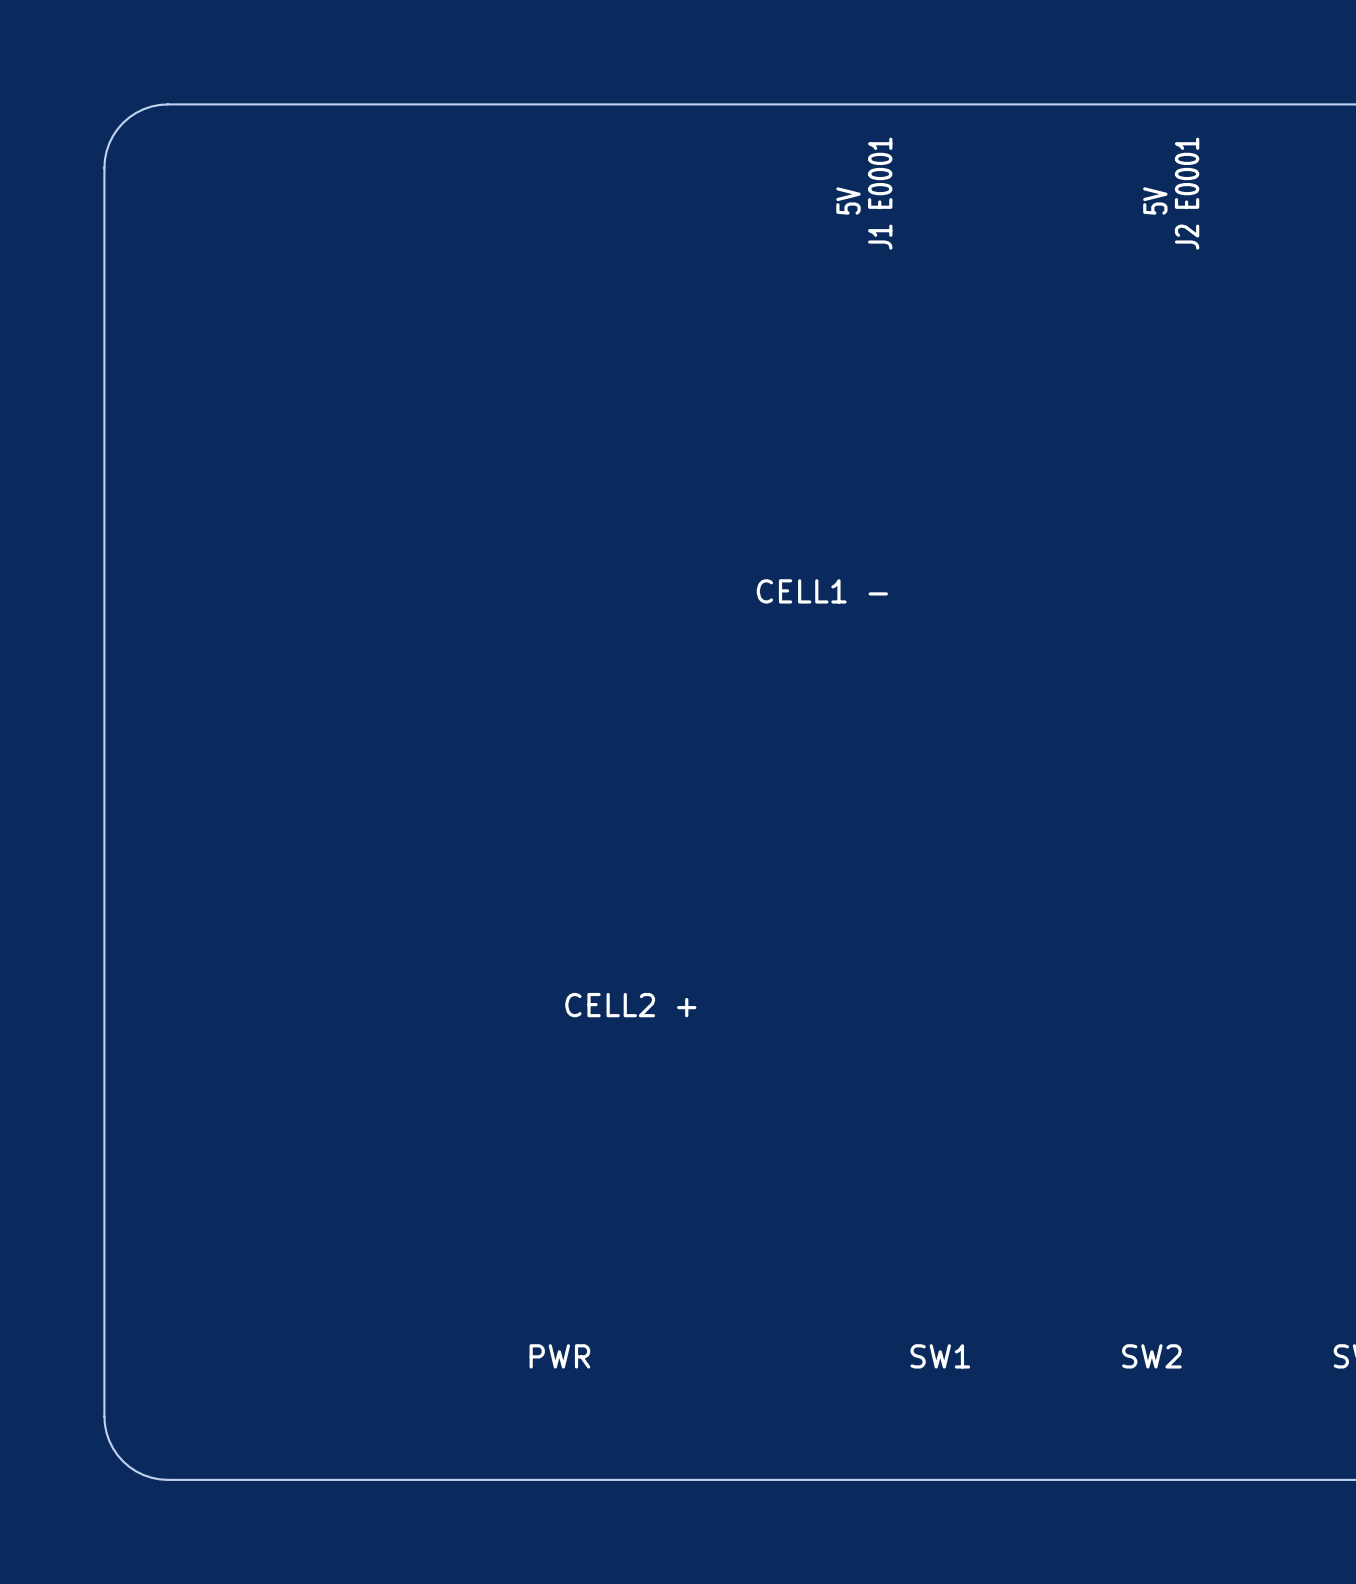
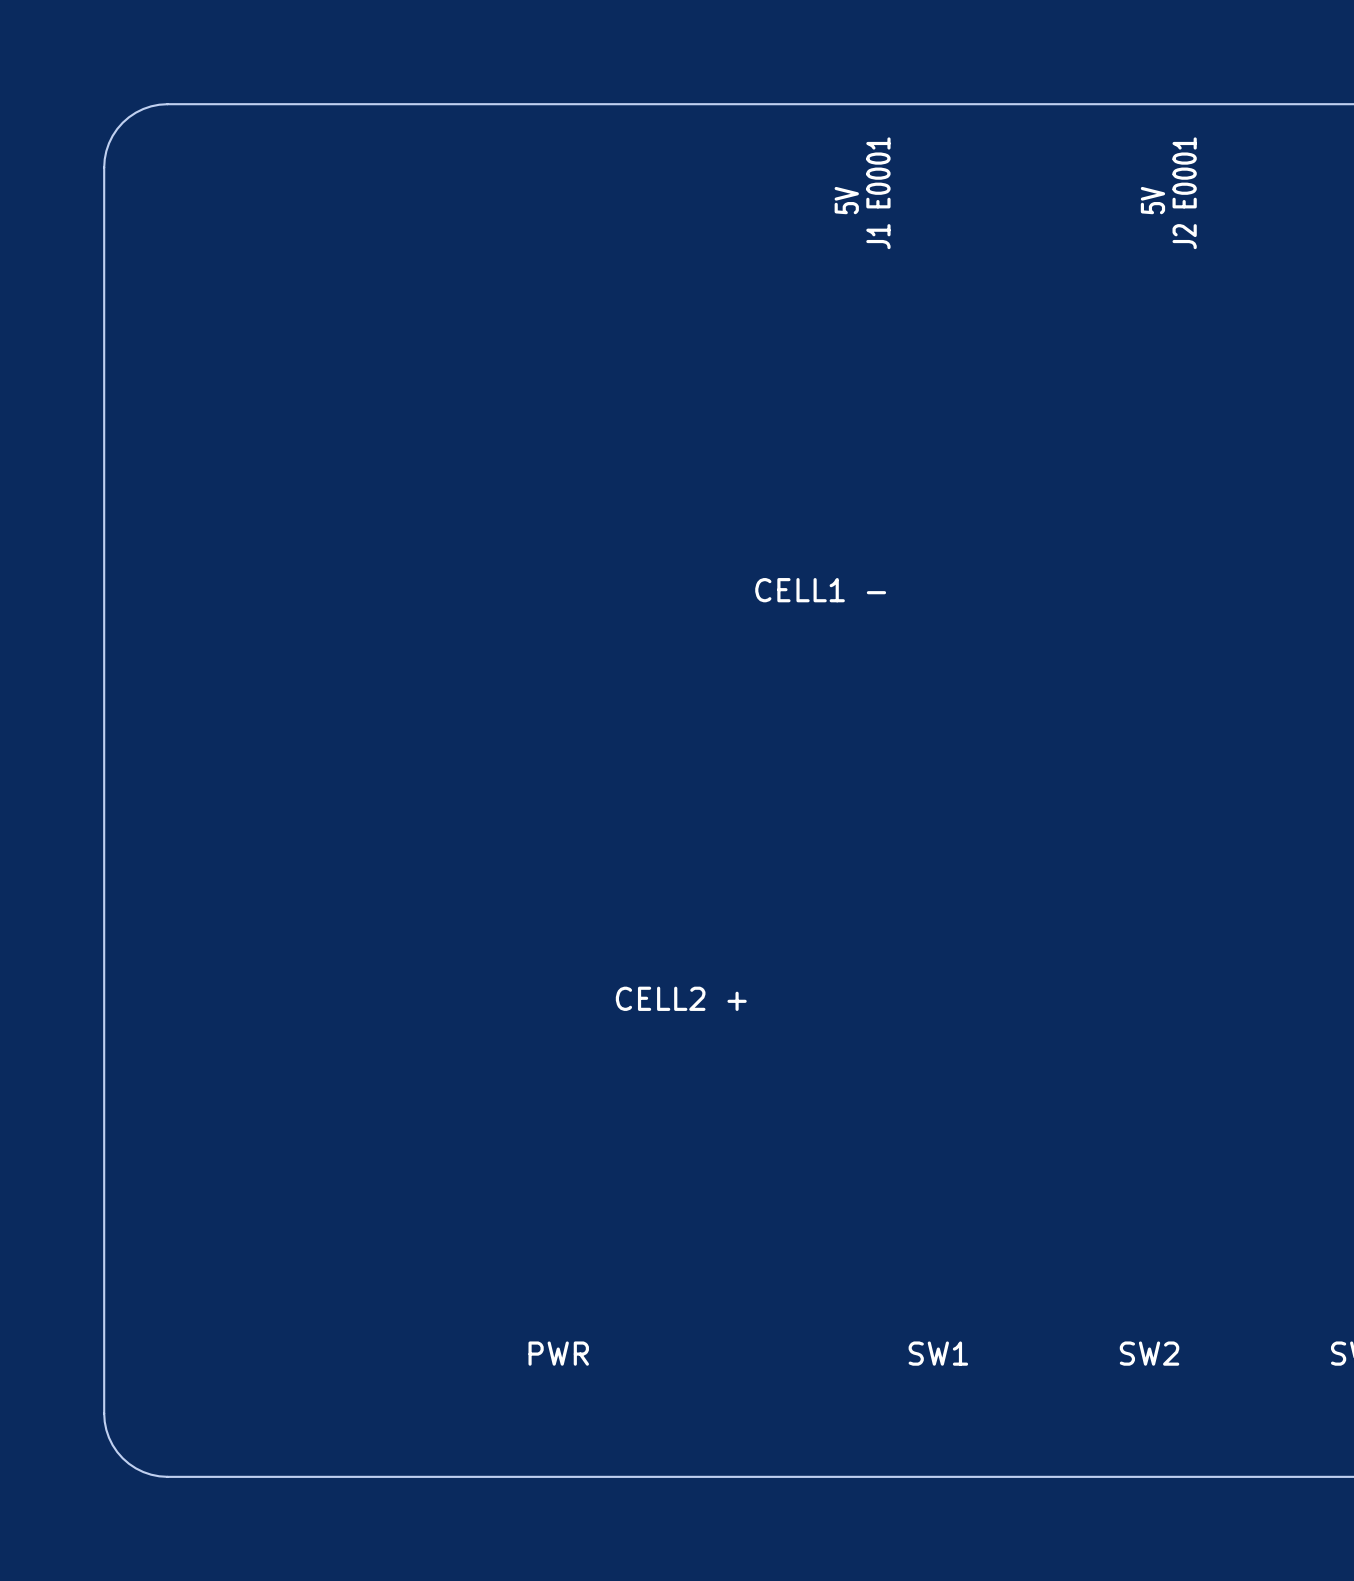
text position: CELL2 + (630, 1005) -> CELL2 + (681, 998)

